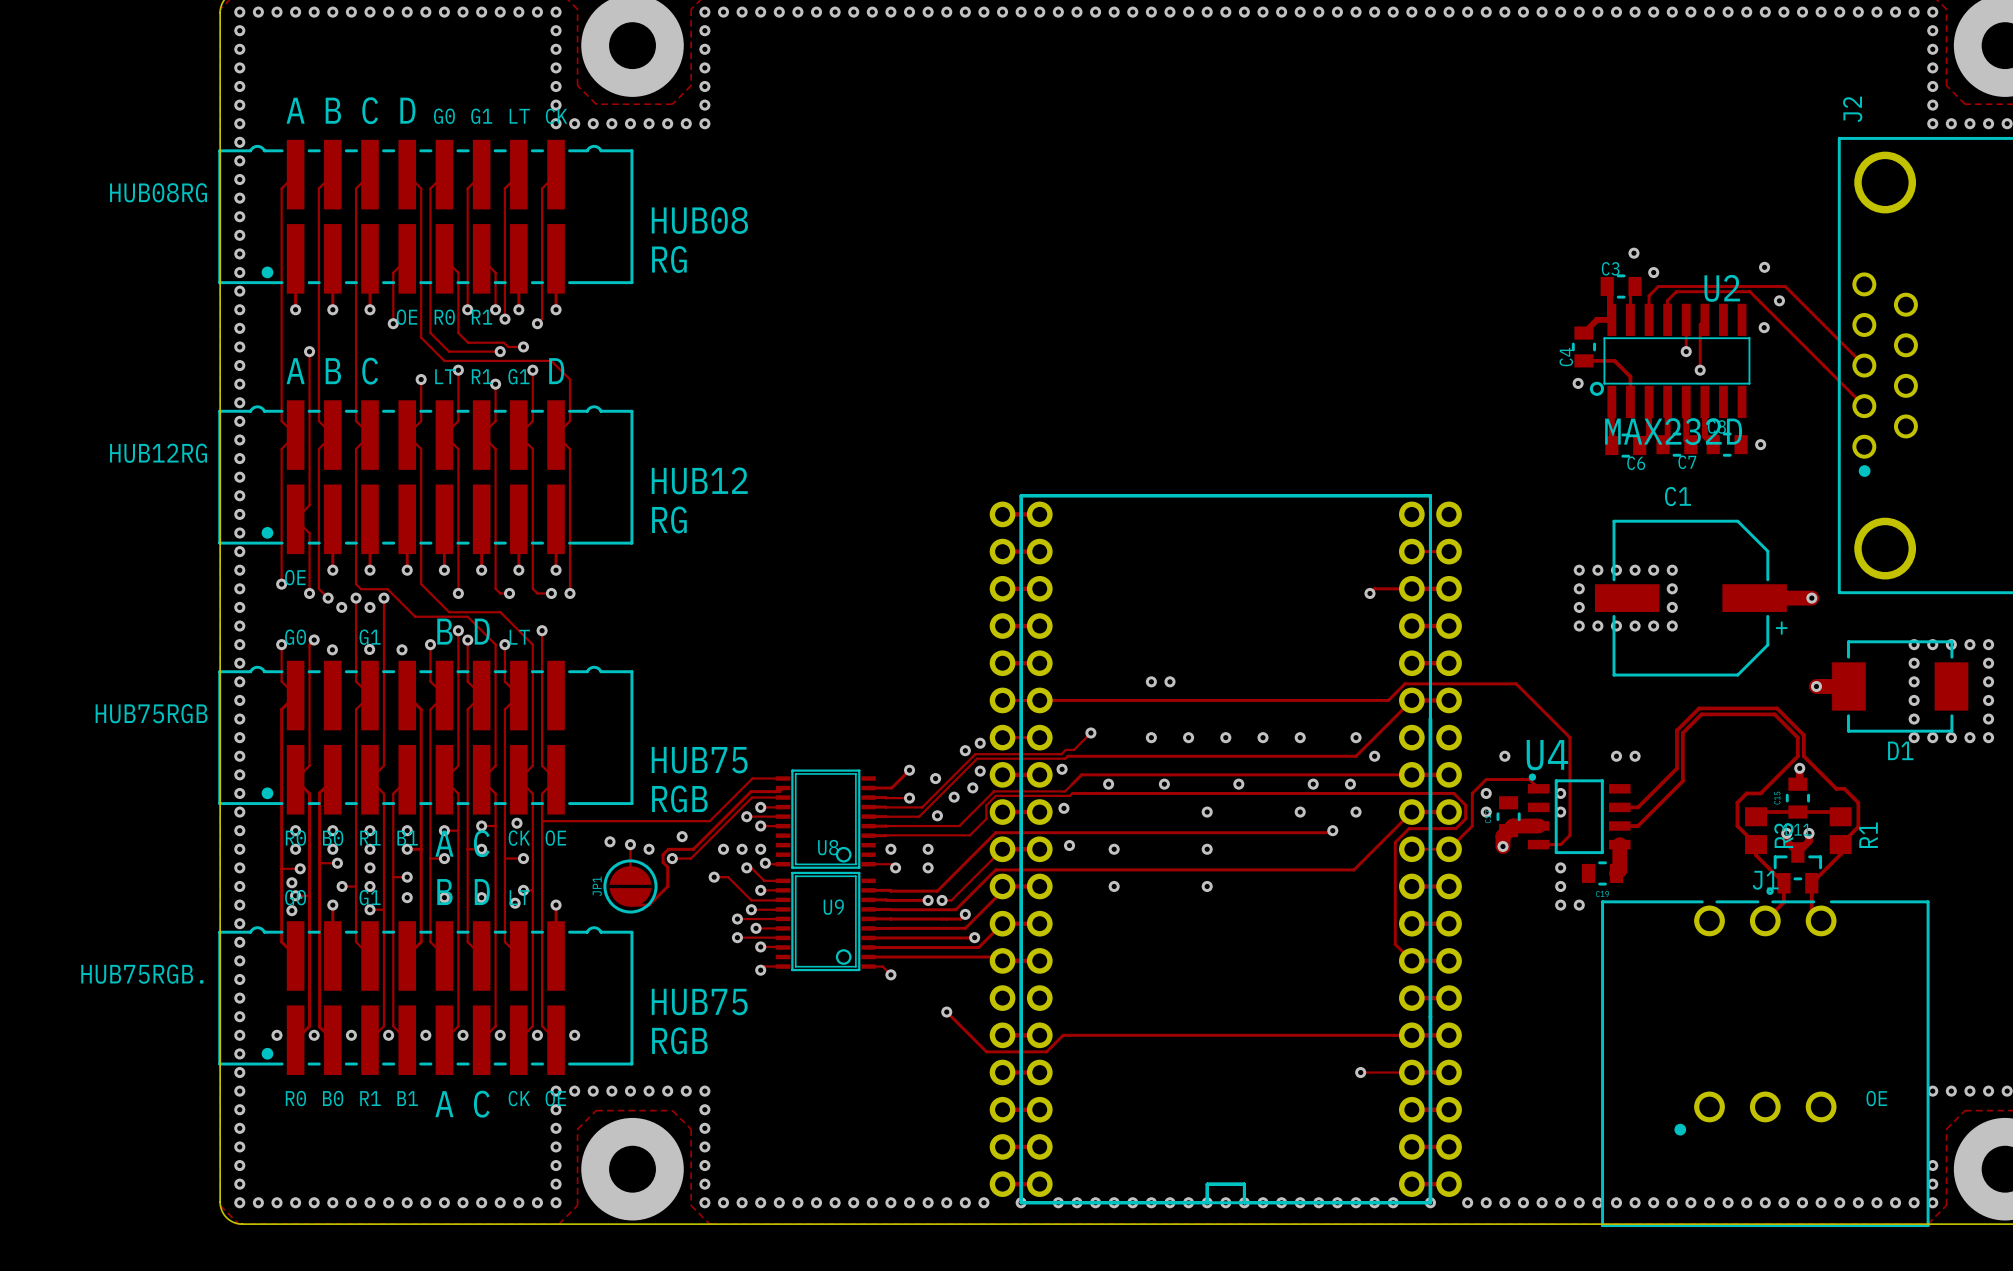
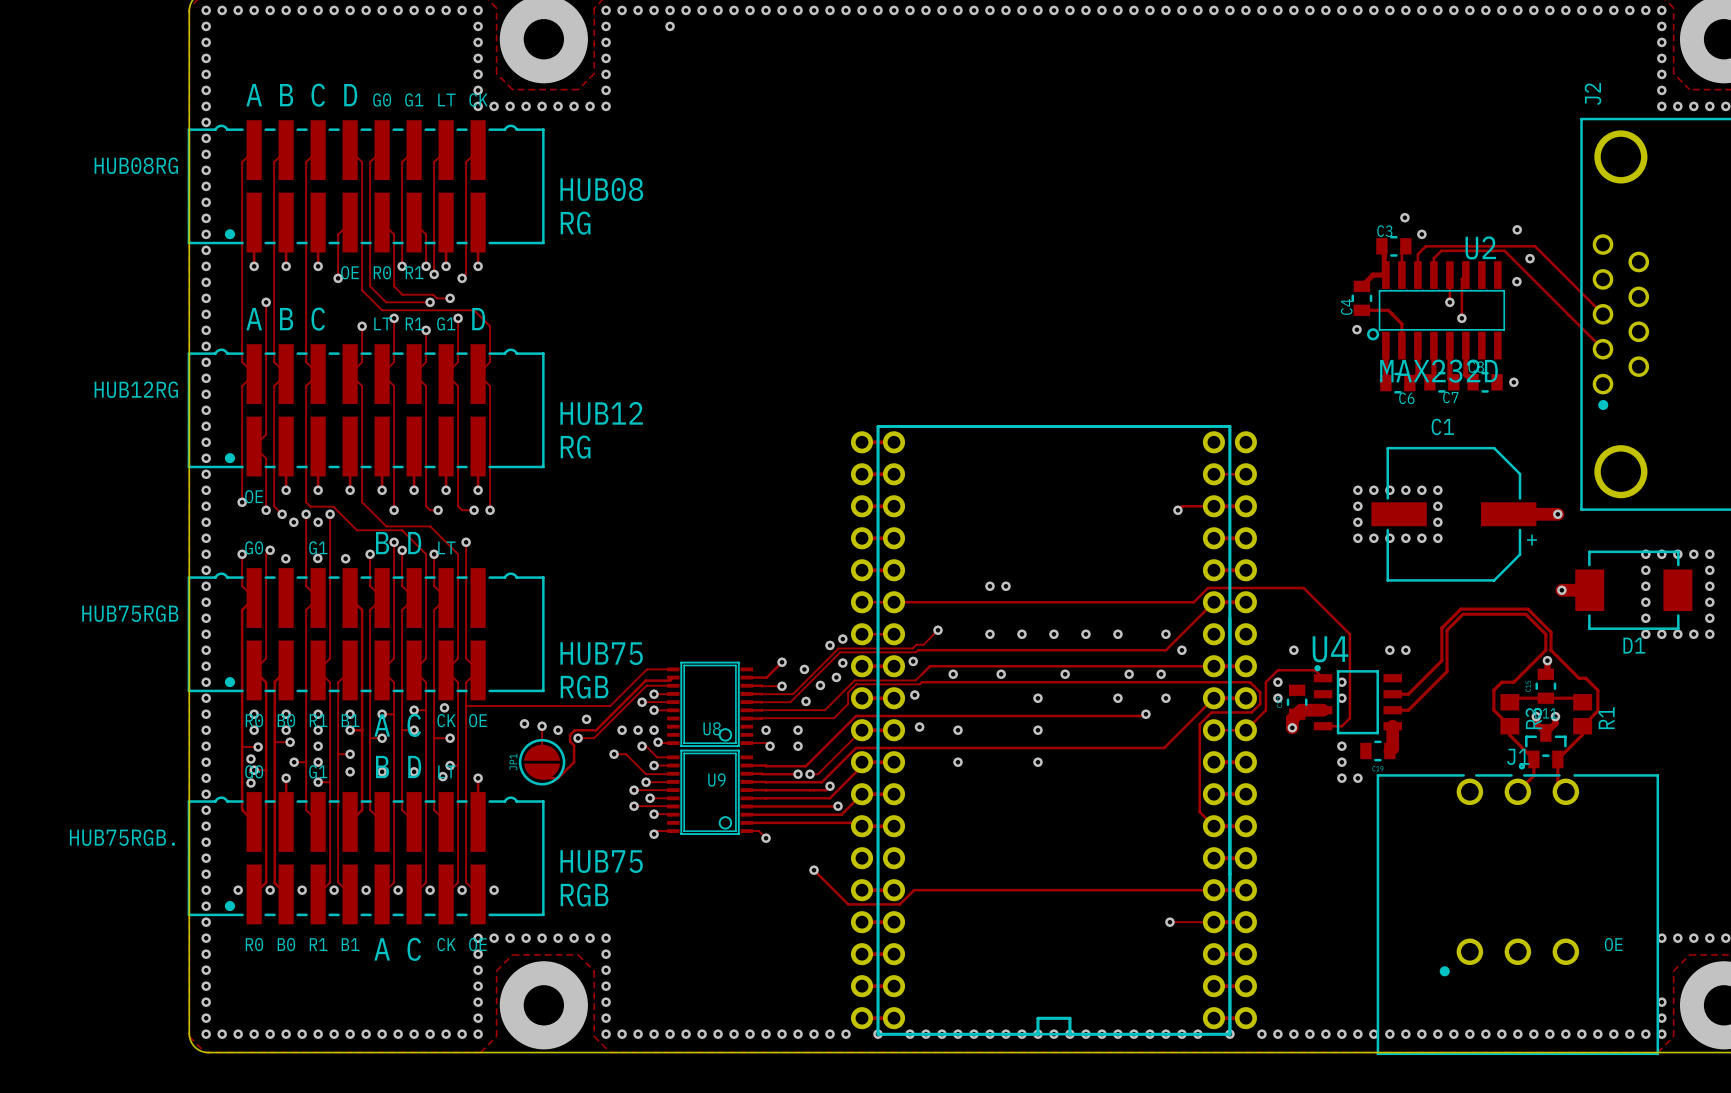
via: none -> (670, 26)

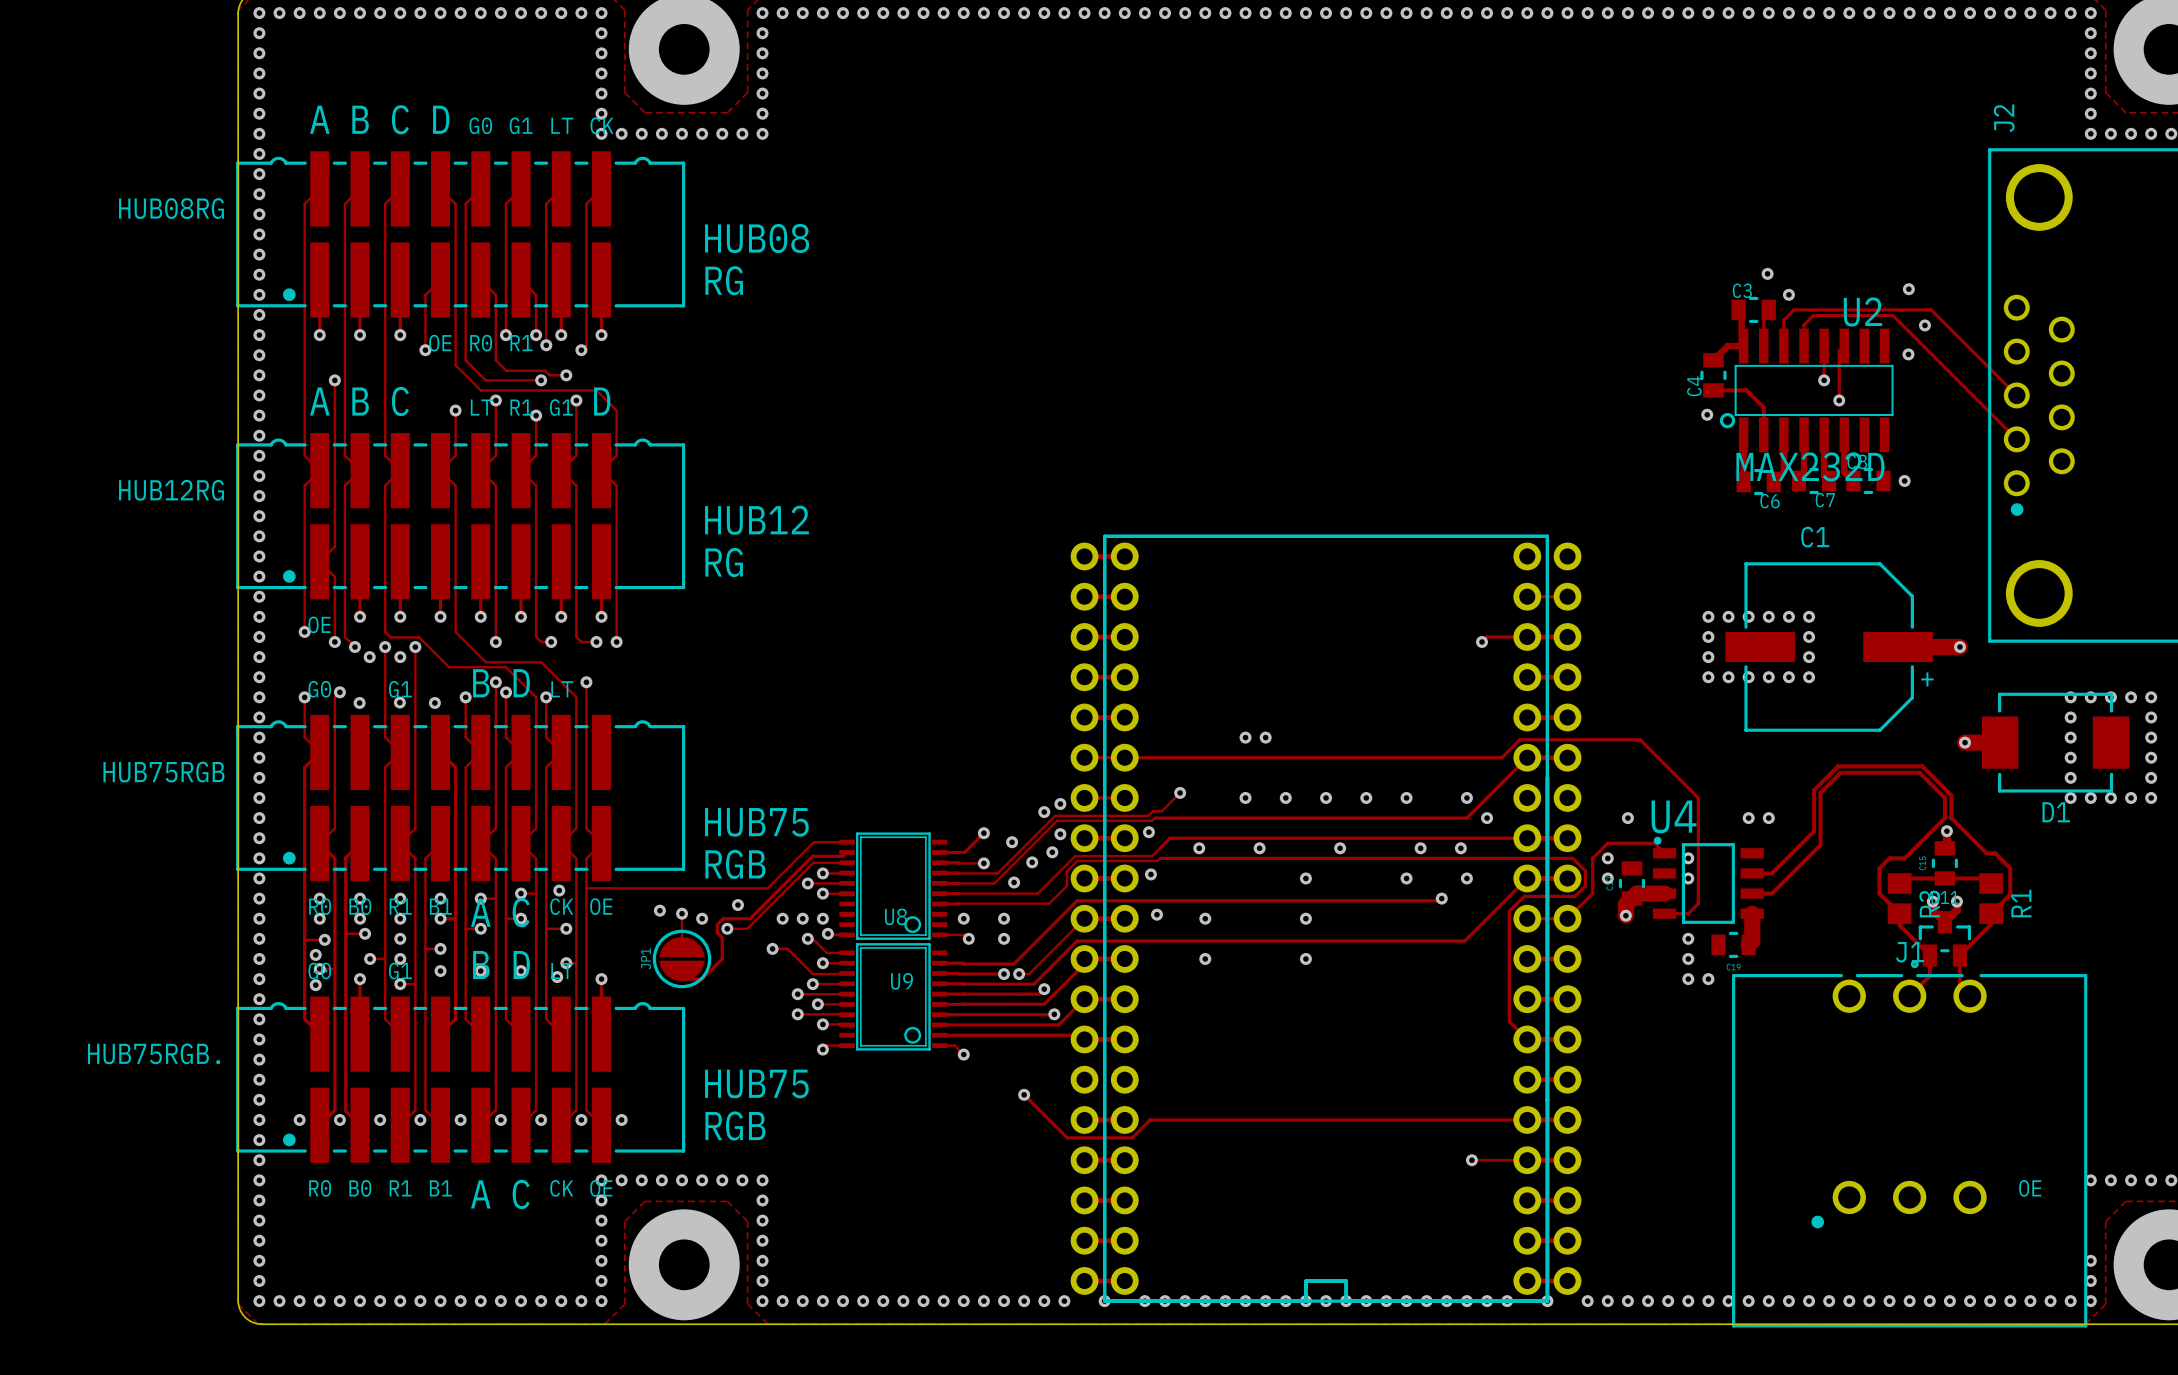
via: (670, 26) -> none

